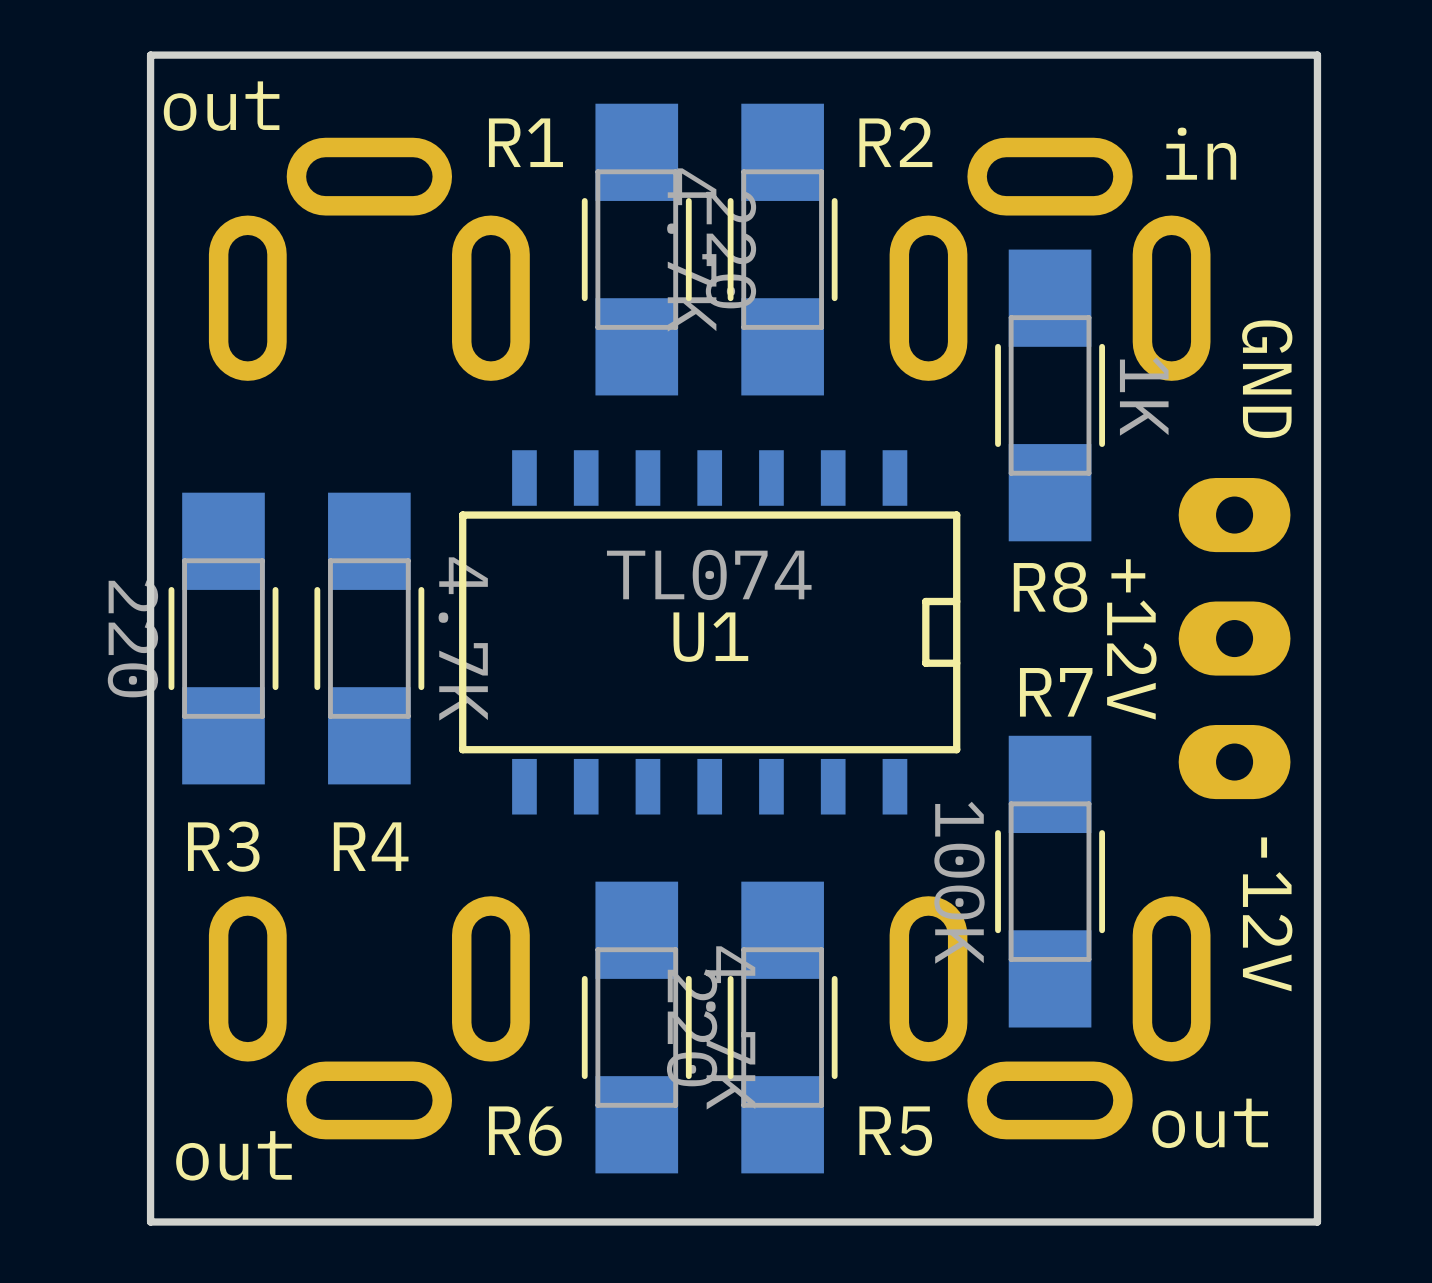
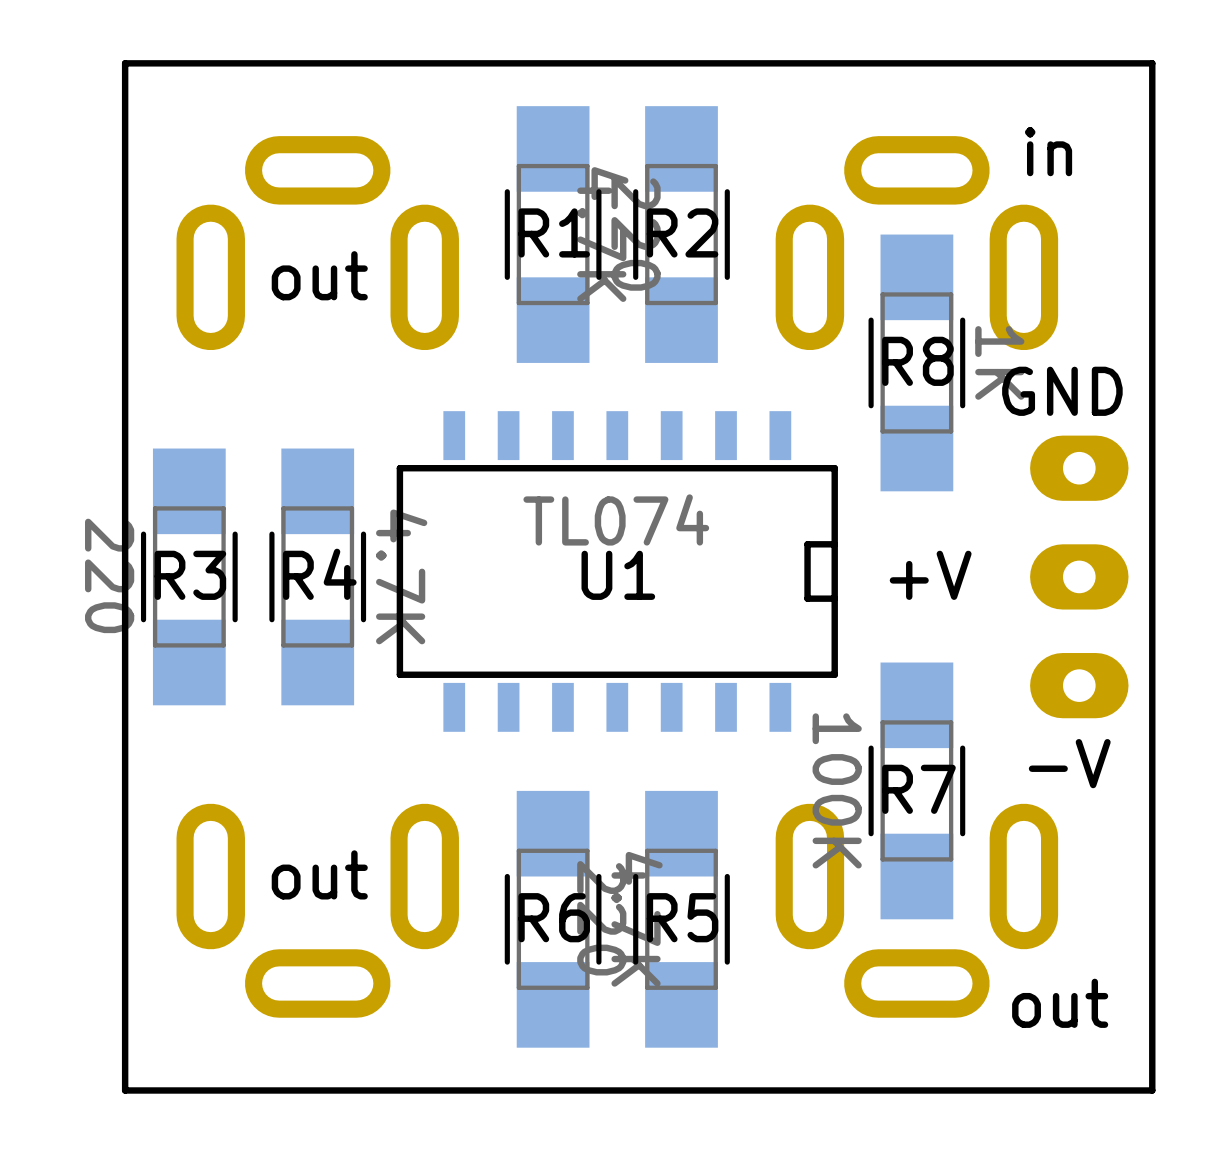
text position: out (221, 106) -> out (319, 275)
R1 name position: R1 (525, 142) -> R1 (554, 232)
R2 name position: R2 (895, 142) -> R2 (682, 232)
part text: GND (1267, 379) -> none
text: none -> GND (1062, 391)
R8 name position: R8 (1050, 587) -> R8 (917, 361)
text: none -> +V (930, 575)
part text: +12V (1131, 639) -> none
R7 name position: R7 (1056, 692) -> R7 (918, 789)
R3 name position: R3 (223, 846) -> R3 (190, 575)
R4 name position: R4 (371, 846) -> R4 (319, 574)
text: none -> -V (1069, 763)
part text: -12V (1267, 914) -> none
R6 name position: R6 (525, 1131) -> R6 (554, 917)
R5 name position: R5 (895, 1131) -> R5 (682, 917)
text position: out (233, 1155) -> out (319, 874)

